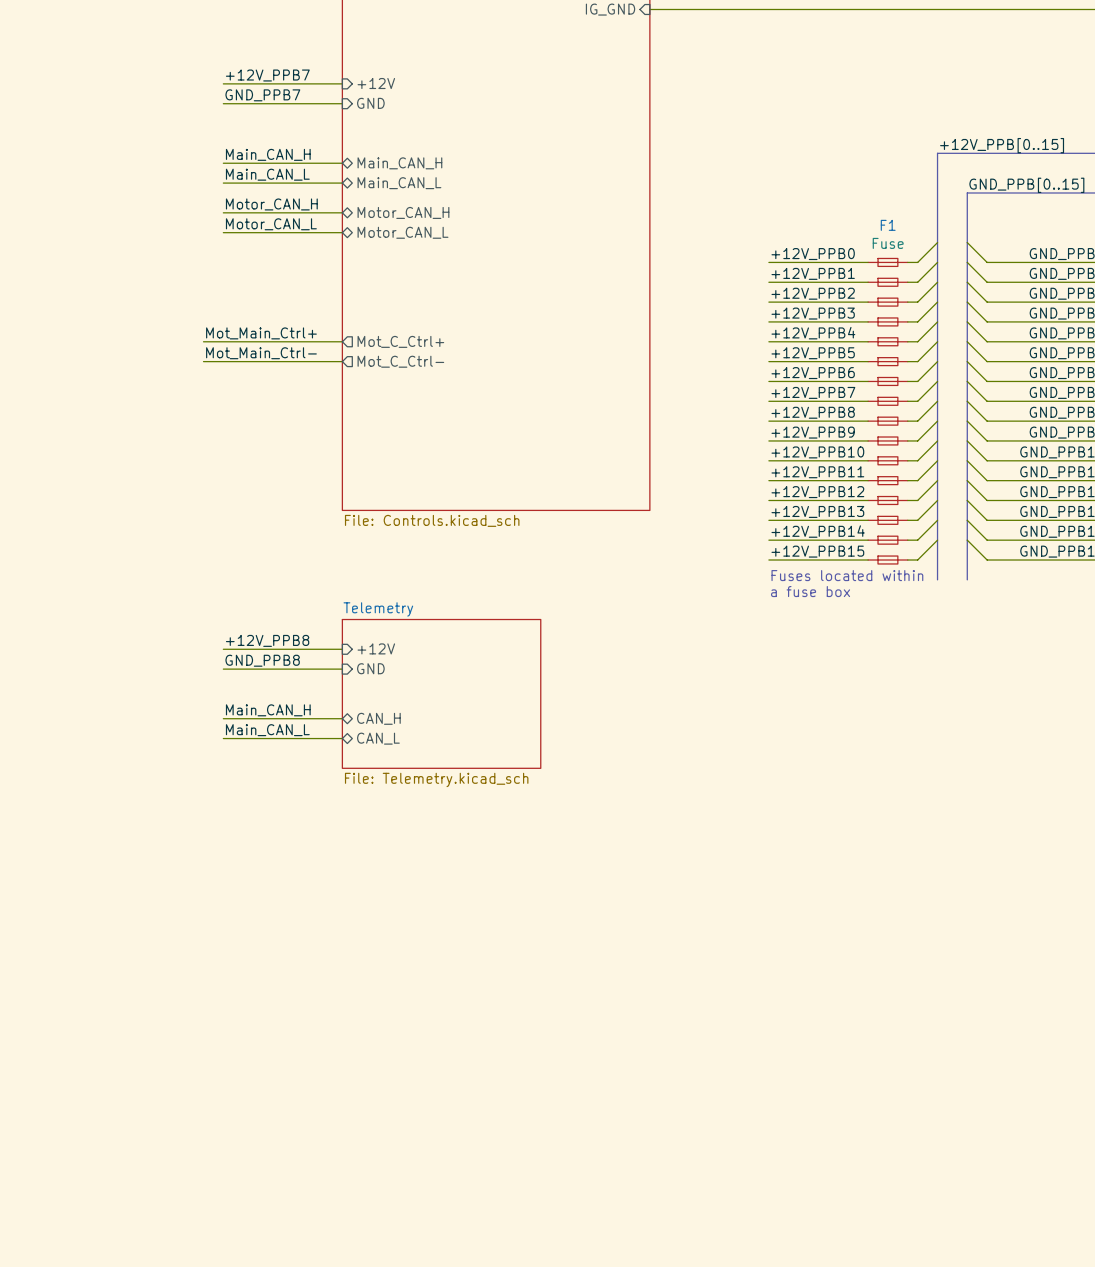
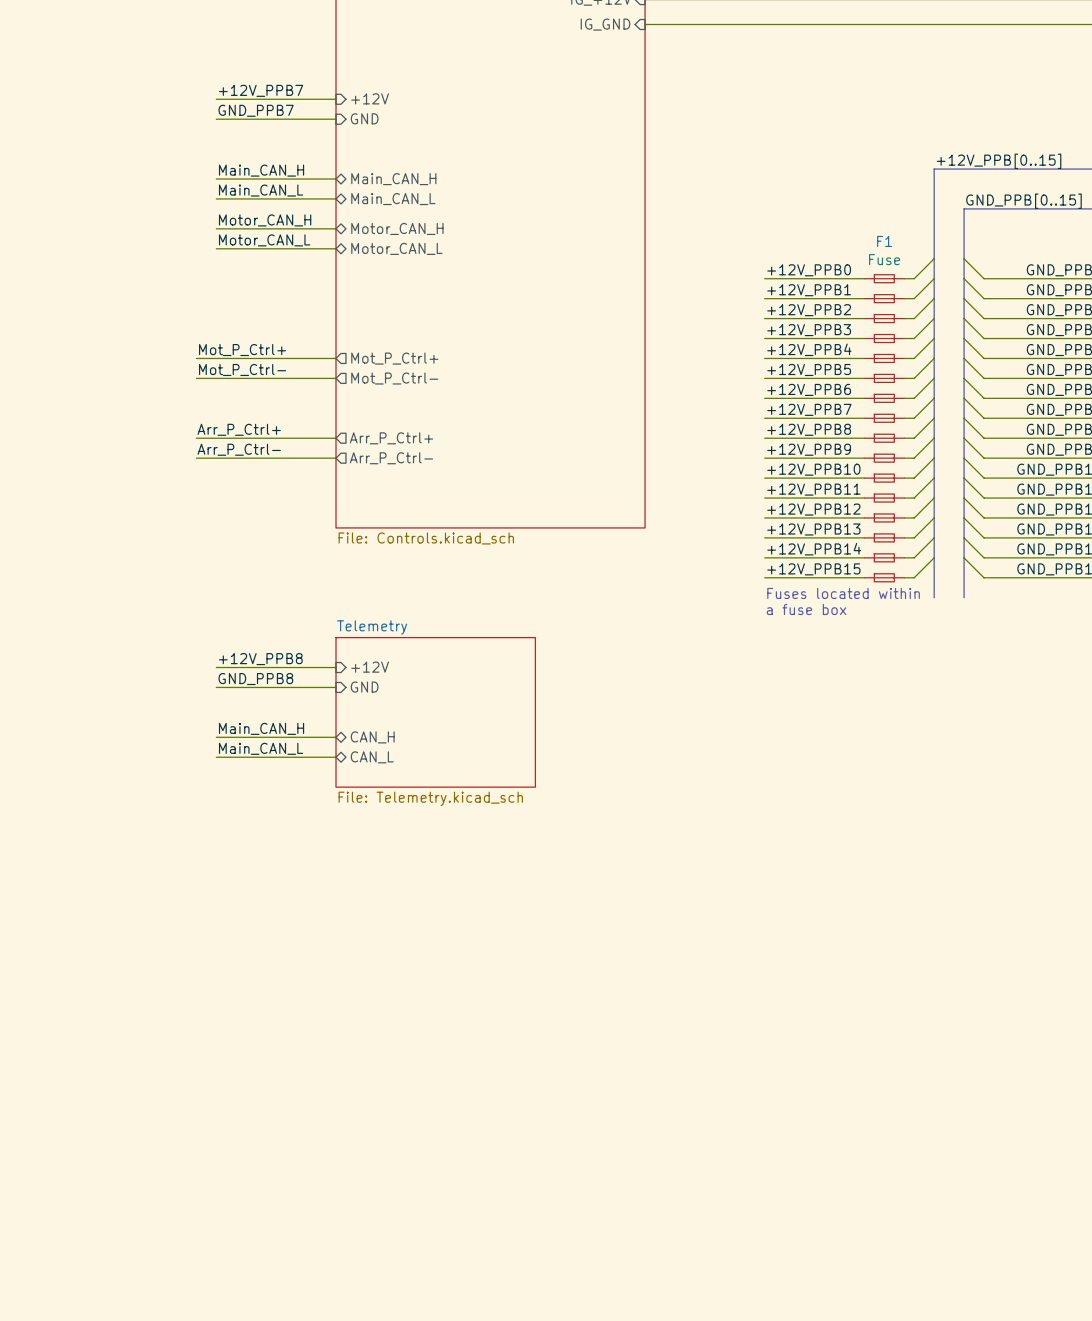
label: Mot_Main_Ctrl+ (261, 333) -> Mot_P_Ctrl+ (242, 350)
sheet pin: Mot_C_Ctrl+ (400, 341) -> Mot_P_Ctrl+ (394, 358)
label: Mot_Main_Ctrl- (261, 353) -> Mot_P_Ctrl- (242, 369)
sheet pin: Mot_C_Ctrl- (400, 361) -> Mot_P_Ctrl- (394, 378)
label: none -> Arr_P_Ctrl+ (239, 429)
wire: none -> (196, 438) (336, 438)
sheet pin: none -> Arr_P_Ctrl+ (391, 438)
label: none -> Arr_P_Ctrl- (239, 449)
wire: none -> (196, 458) (336, 458)
sheet pin: none -> Arr_P_Ctrl- (391, 458)

